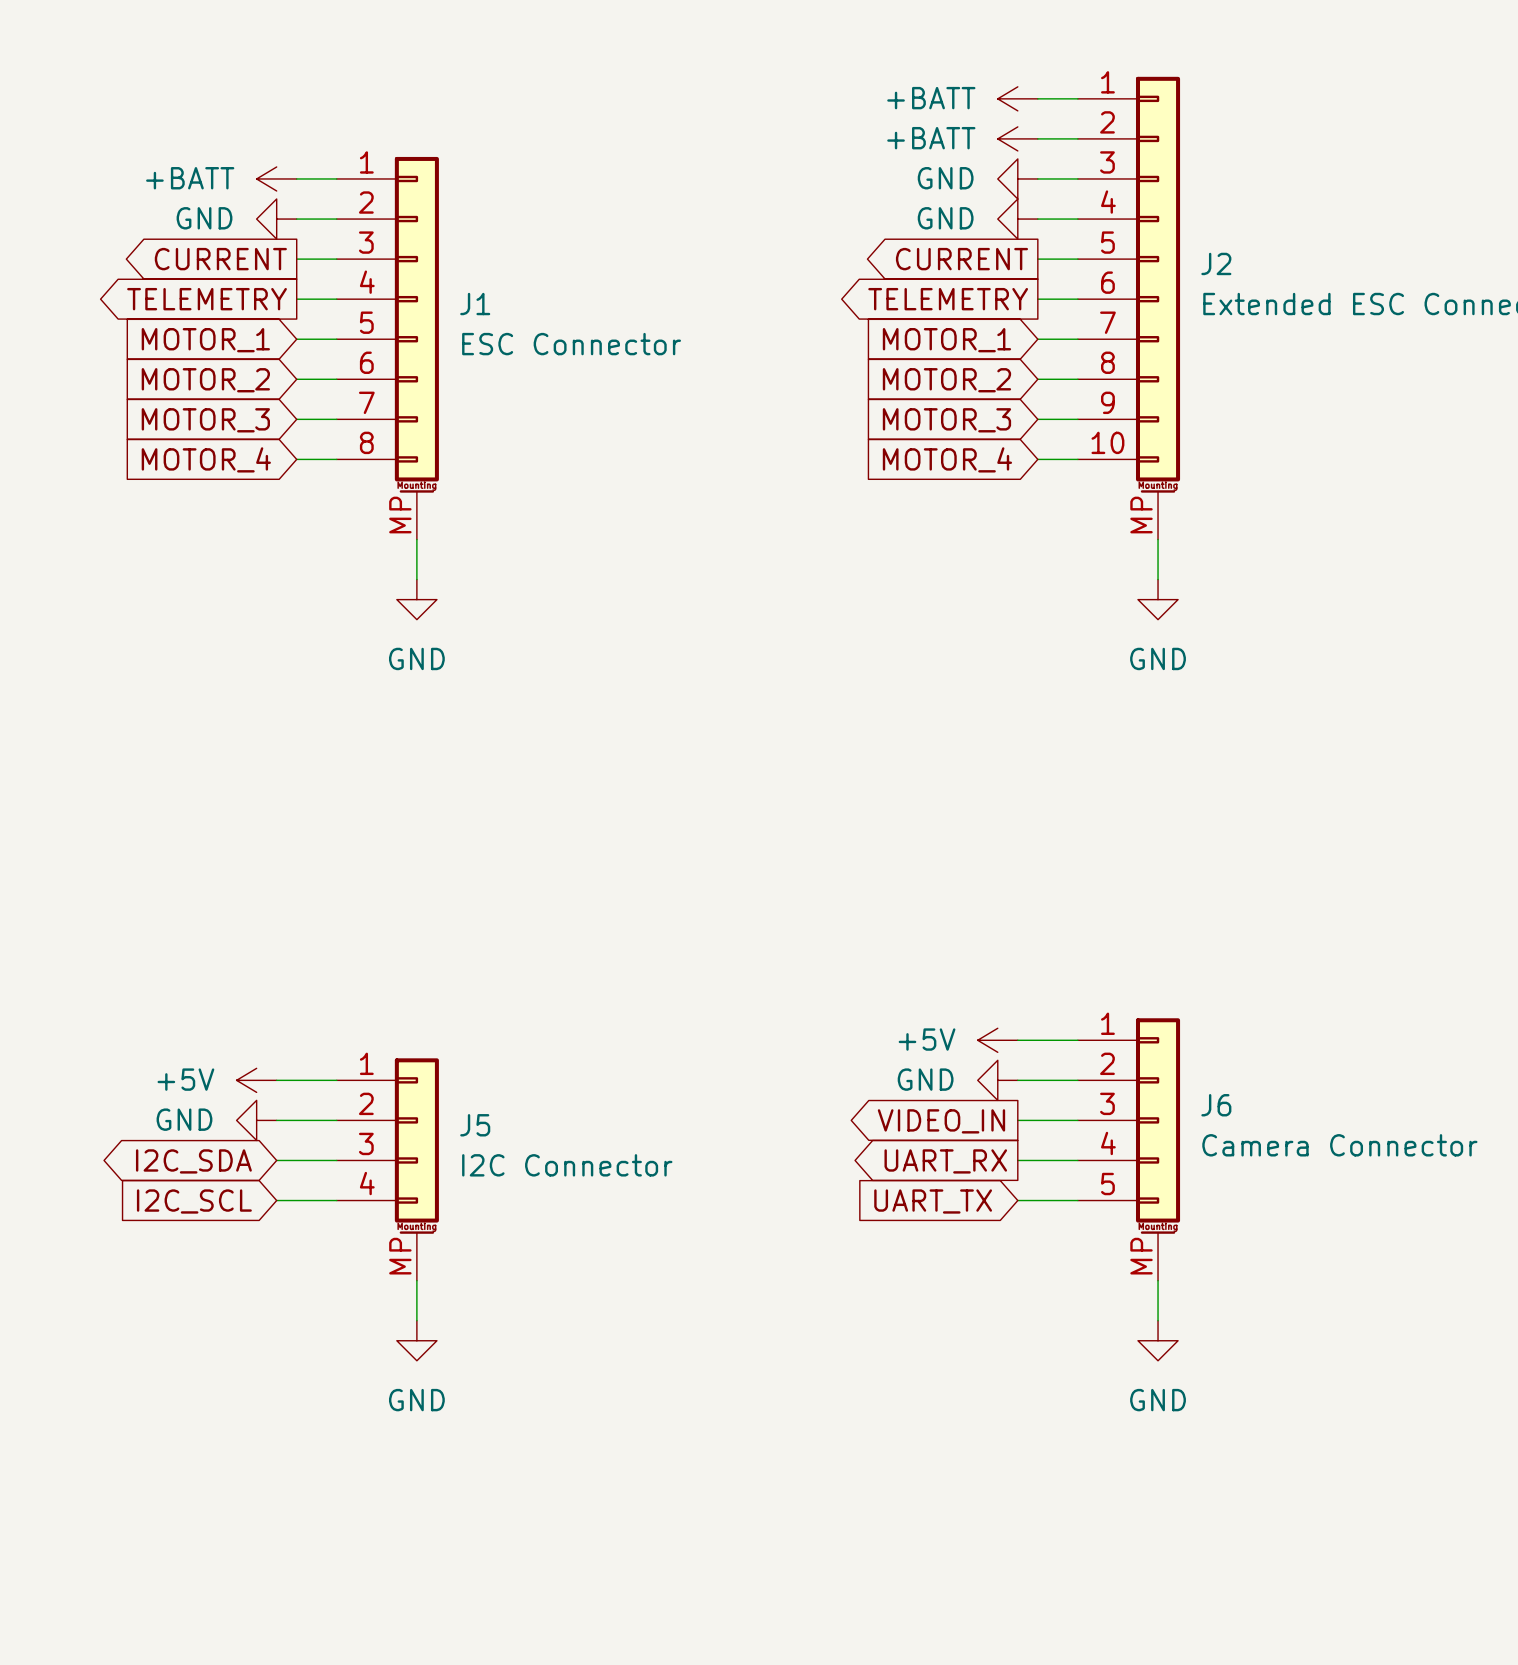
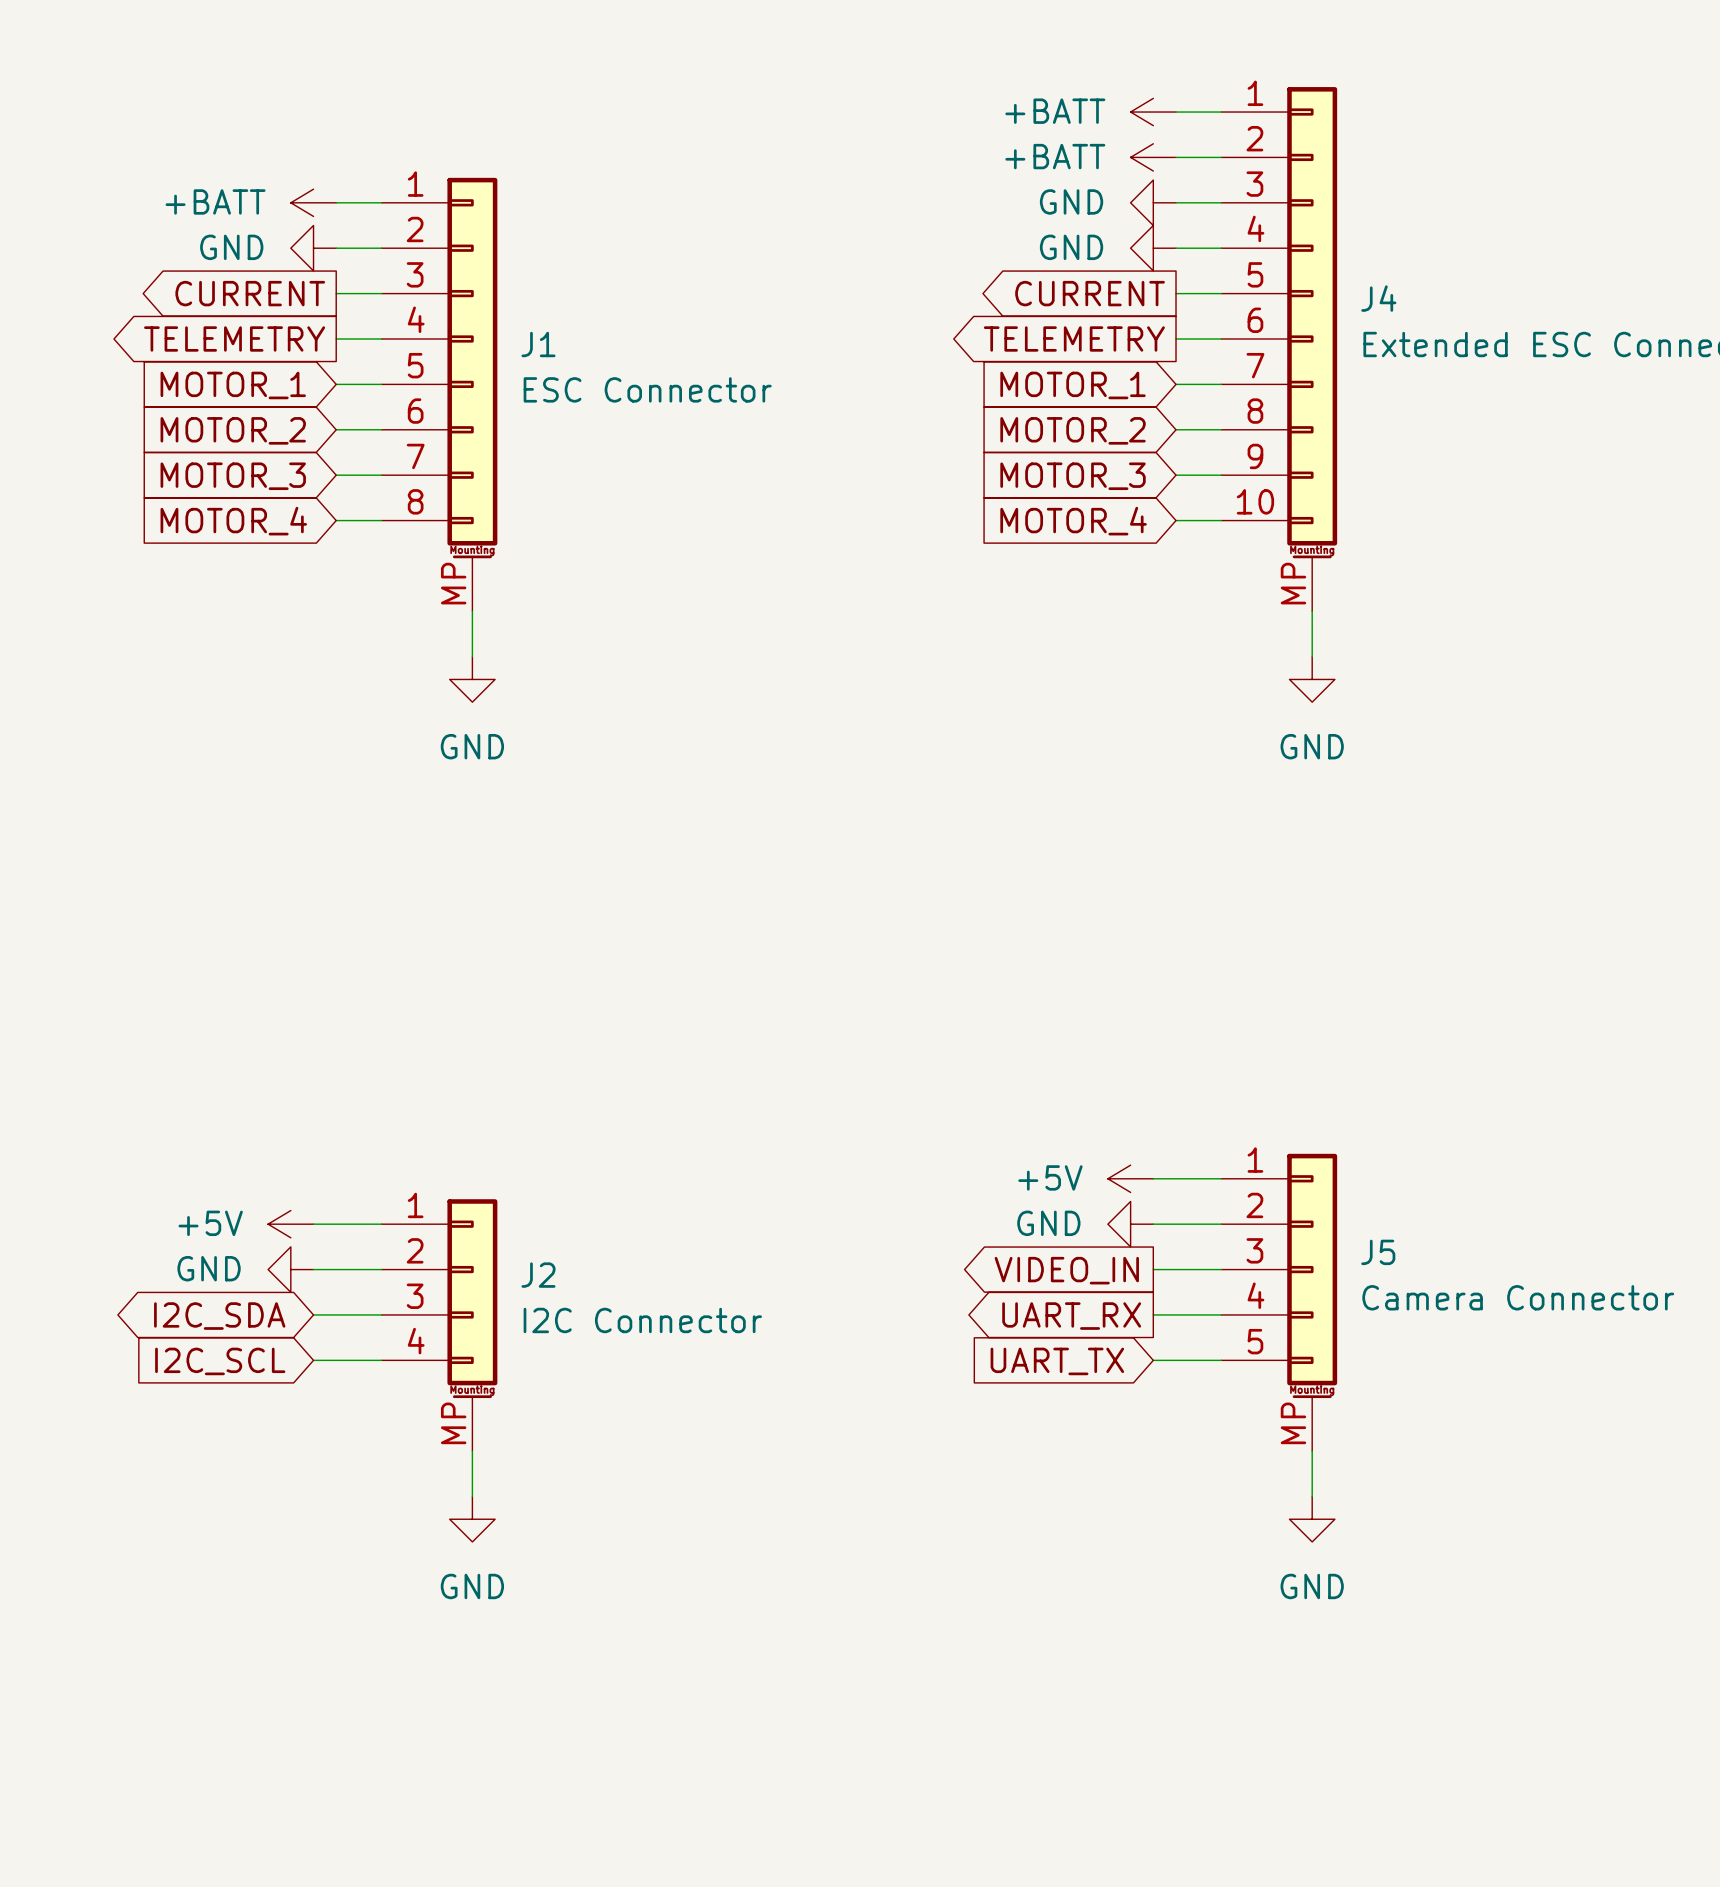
J2 name: J2 (1216, 263) -> J4 (1378, 298)
J6 name: J6 (1216, 1105) -> J5 (1378, 1252)
J5 name: J5 (475, 1125) -> J2 (538, 1275)

